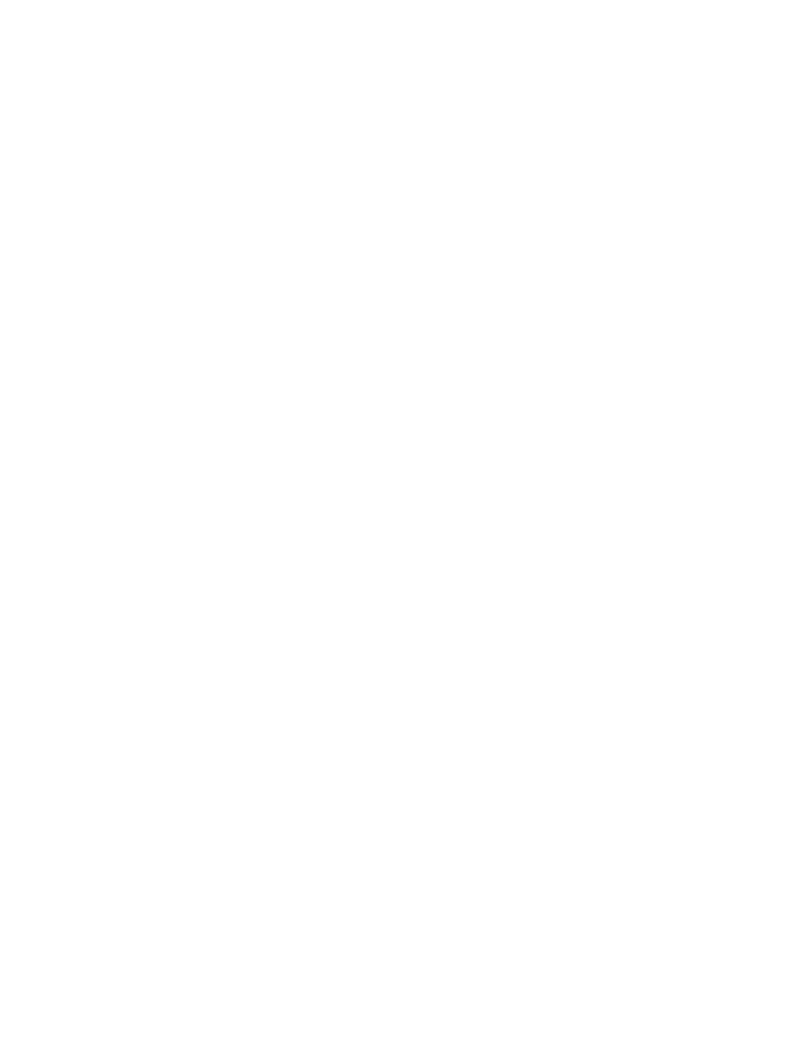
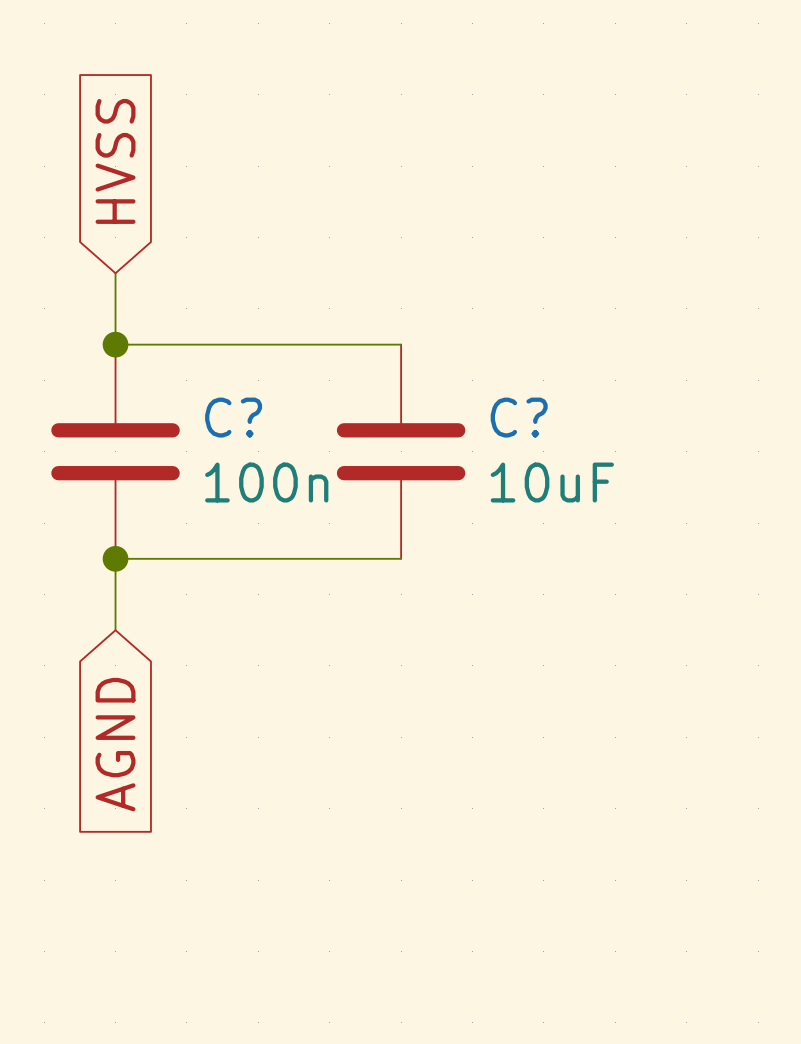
global label: none -> HVSS (115, 161)
wire: none -> (115, 273) (115, 344) (401, 344)
junction: none -> (115, 344)
C?: none -> 100n (115, 451)
C?: none -> 10uF (401, 451)
junction: none -> (115, 558)
wire: none -> (401, 558) (115, 558) (115, 630)
global label: none -> AGND (115, 744)

